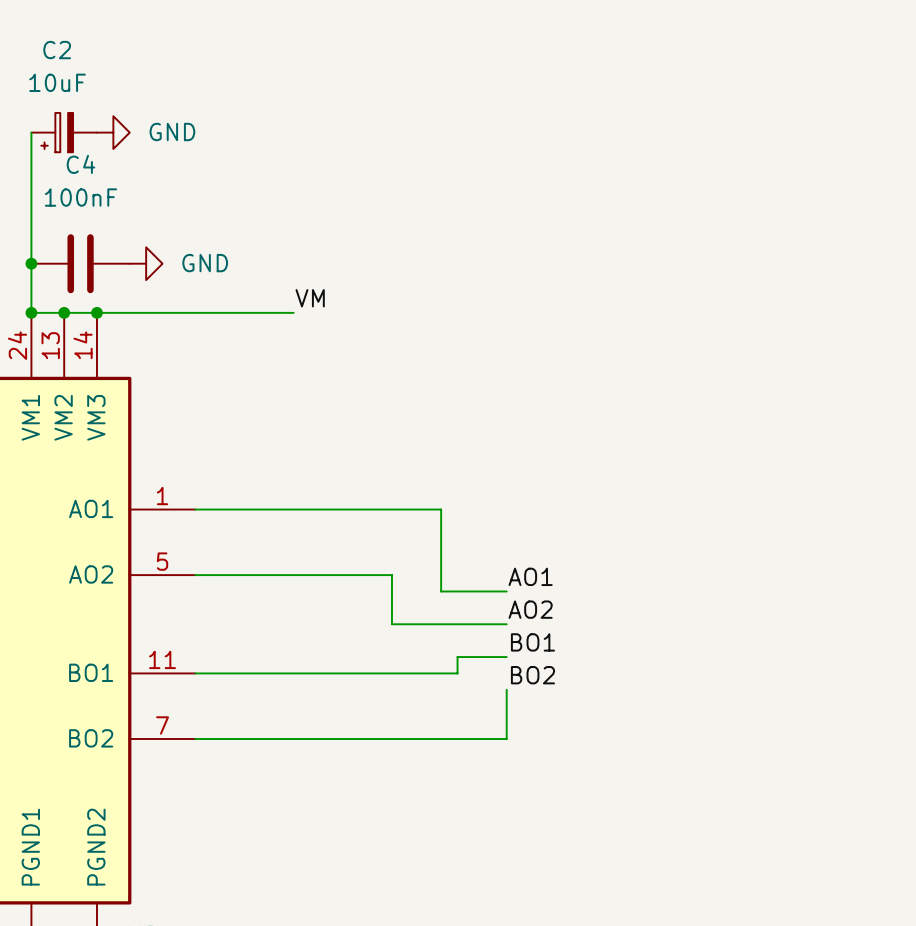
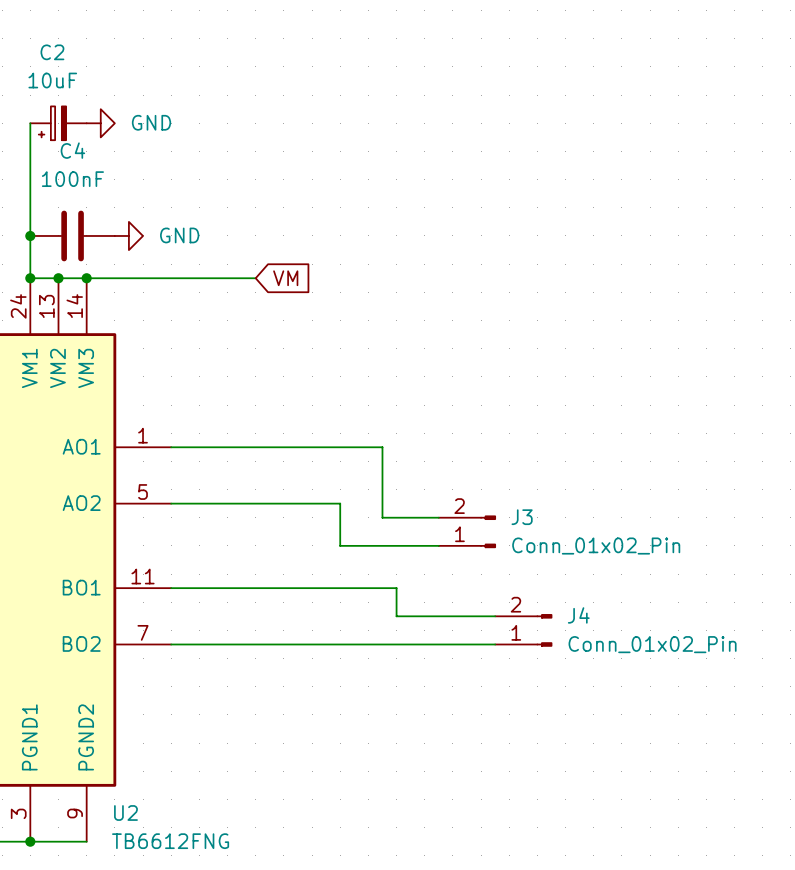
label: VM (310, 298) -> none
global label: none -> VM (285, 278)
label: AO1 (530, 576) -> none
J3: none -> Conn_01x02_Pin (467, 531)
label: AO2 (530, 609) -> none
label: BO1 (532, 642) -> none
wire: (506, 657) (457, 657) (457, 673) -> (495, 616) (396, 616) (396, 588)
label: BO2 (532, 675) -> none
wire: (506, 689) (506, 738) -> (495, 644) (438, 644)
J4: none -> Conn_01x02_Pin (523, 630)

